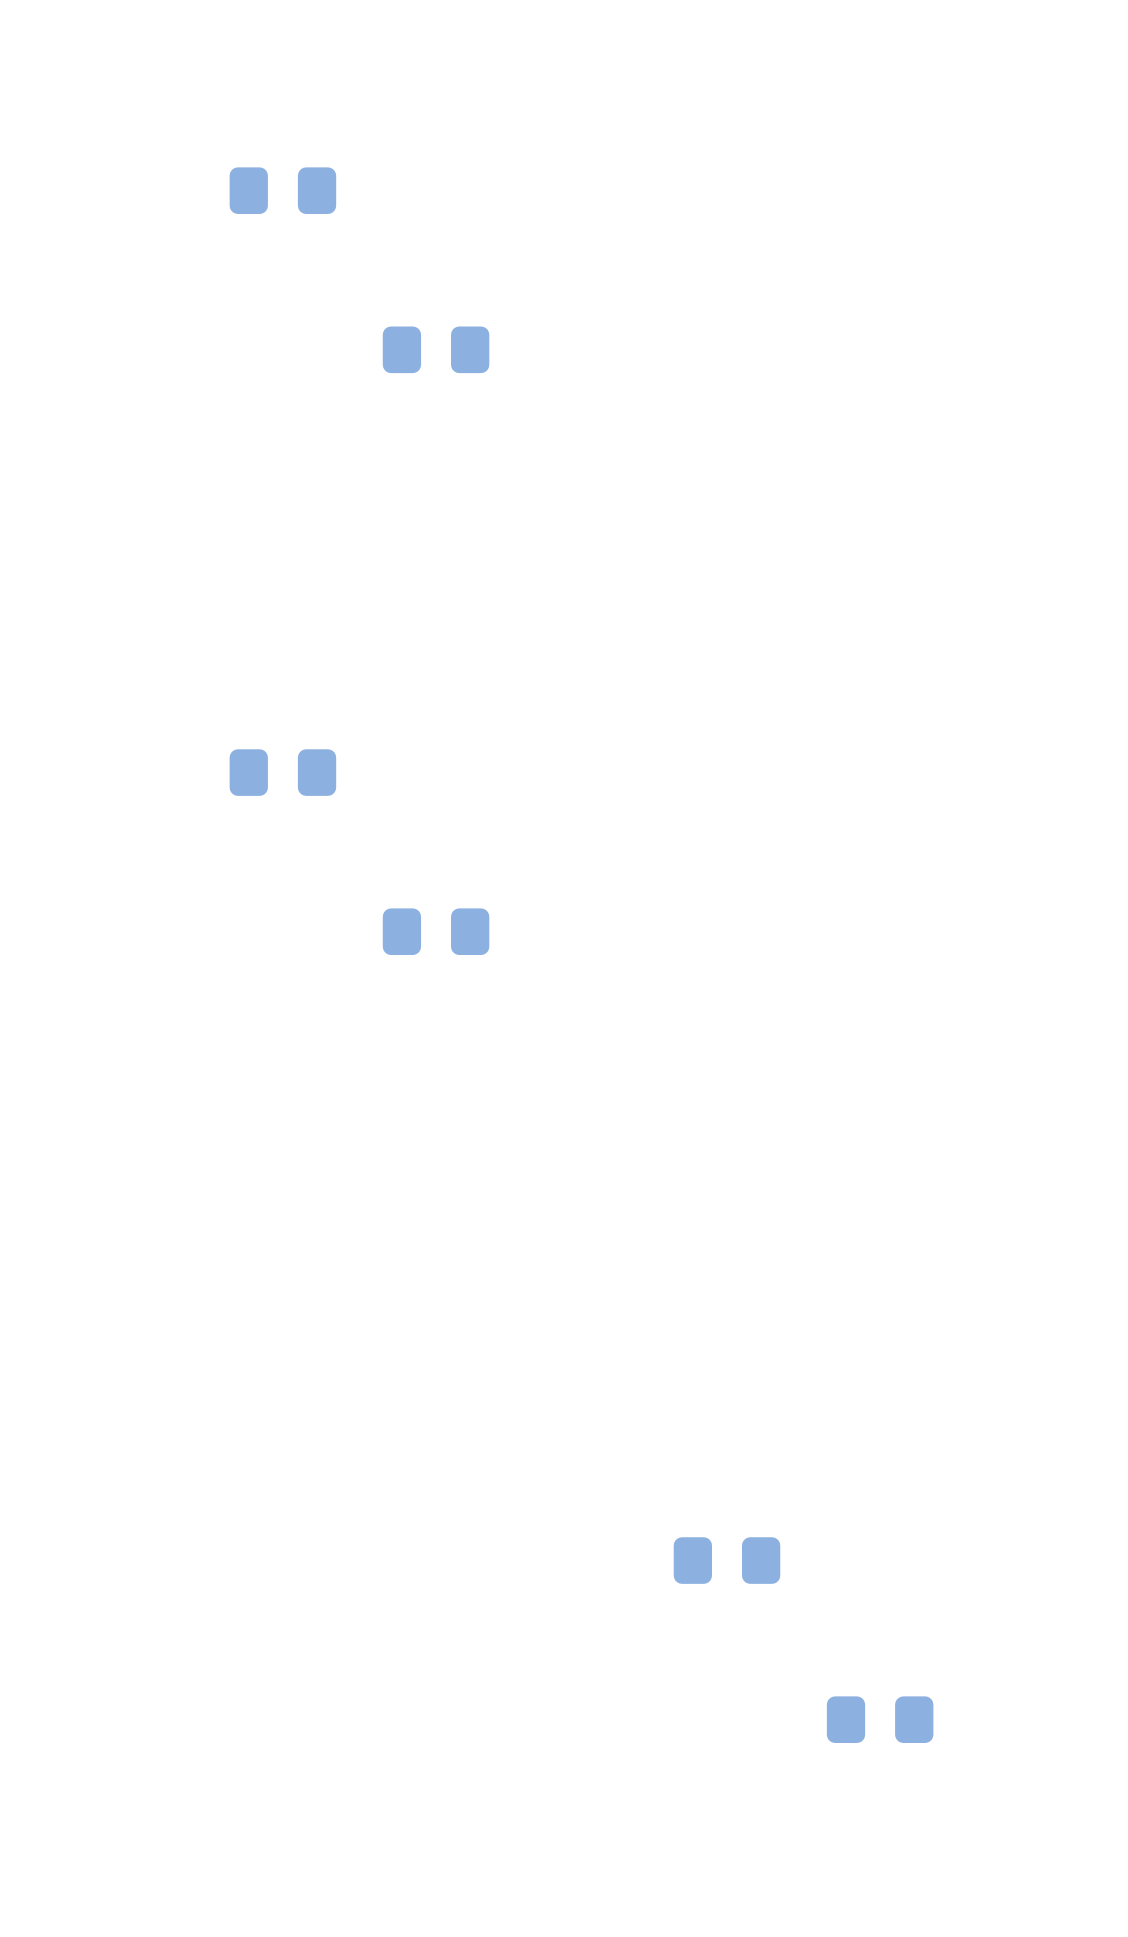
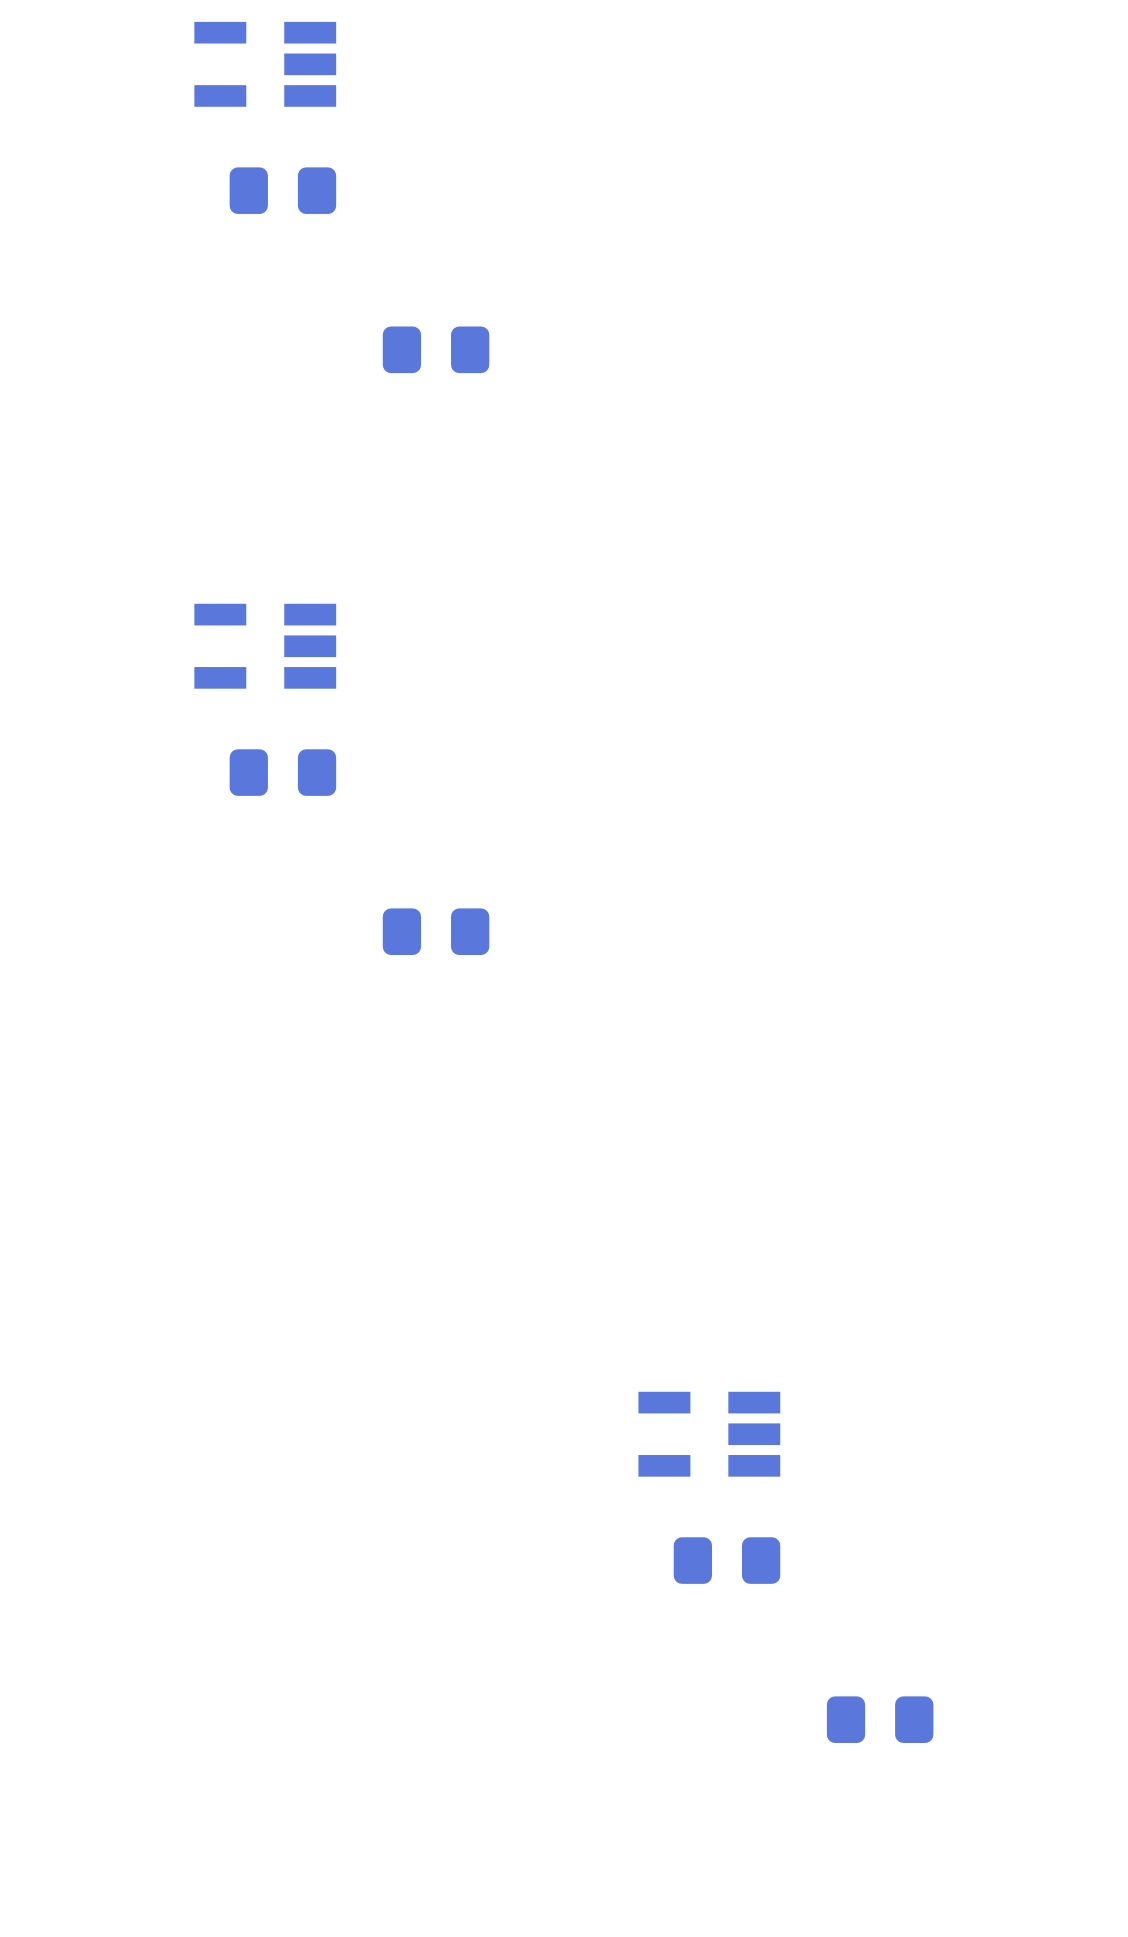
part: none -> (265, 64)
part: none -> (265, 646)
part: none -> (709, 1434)

